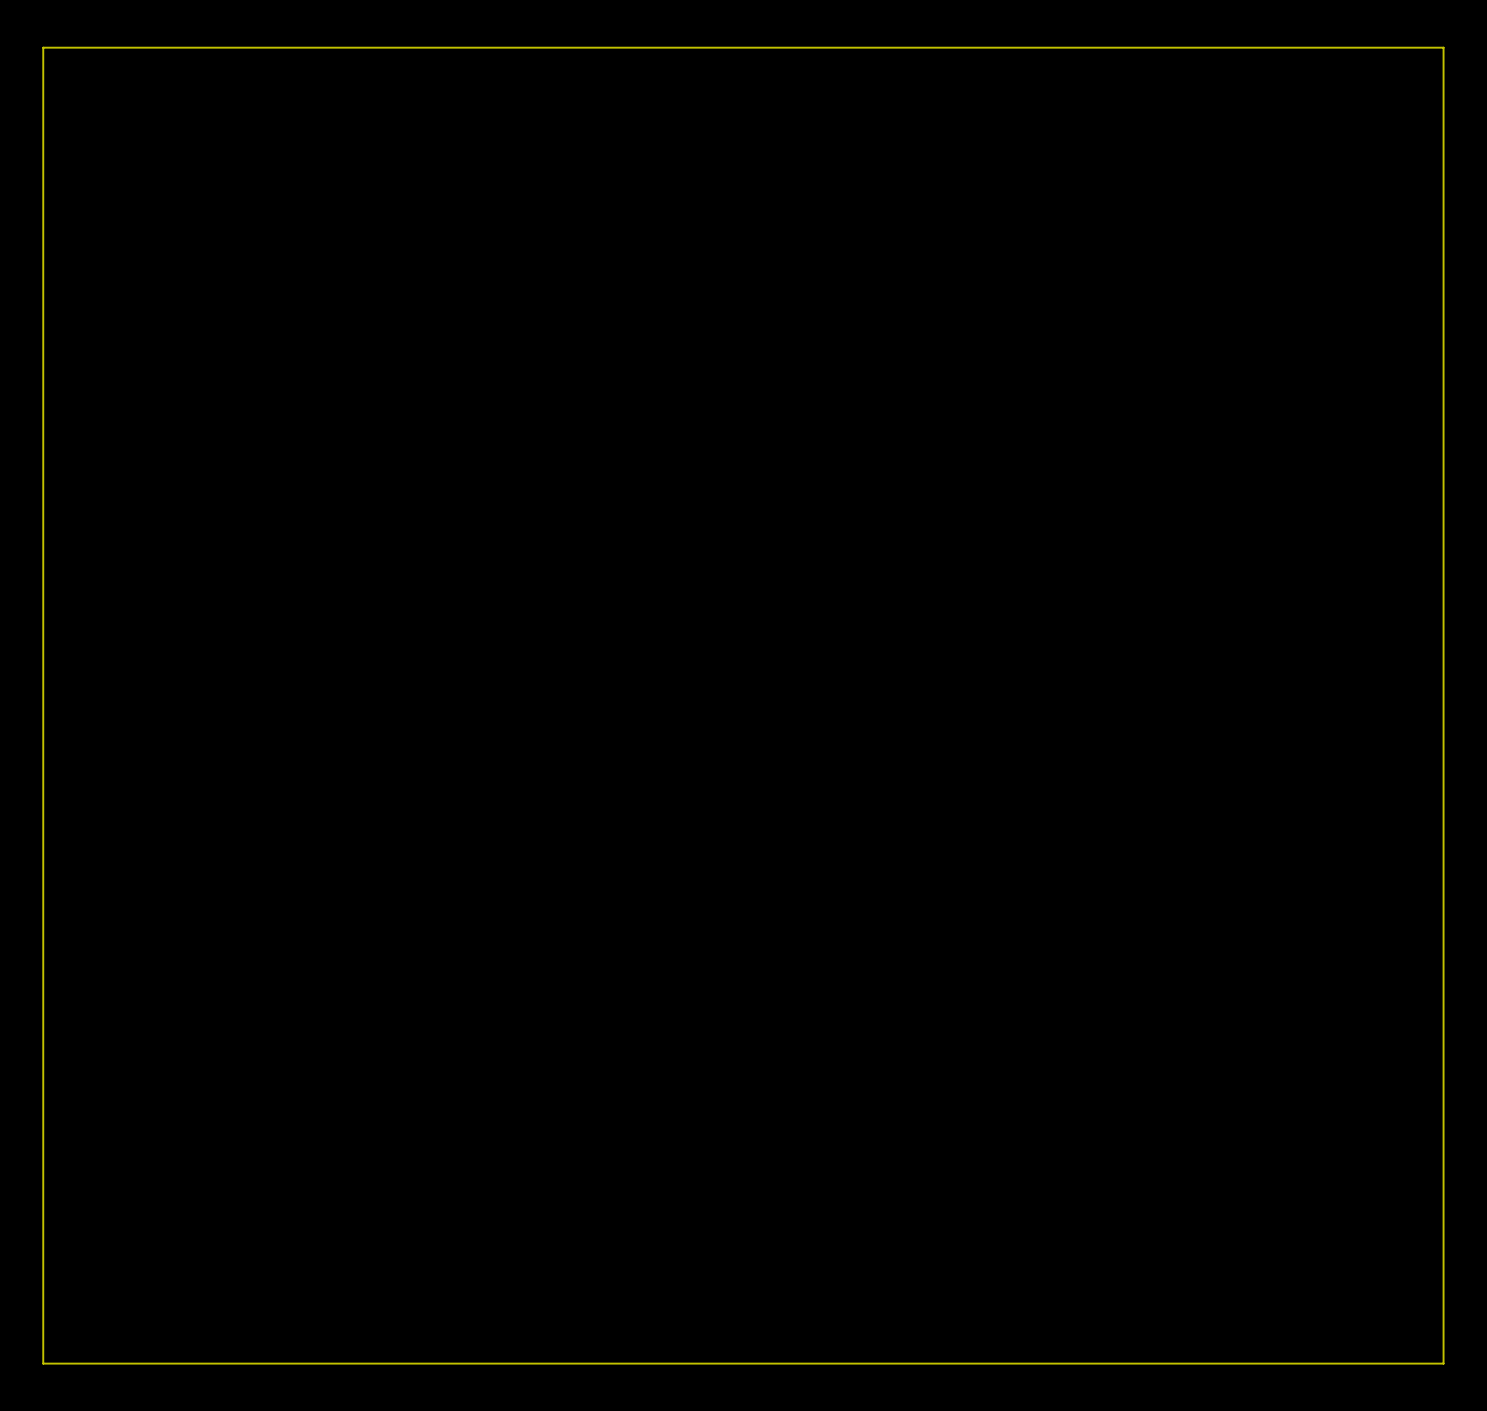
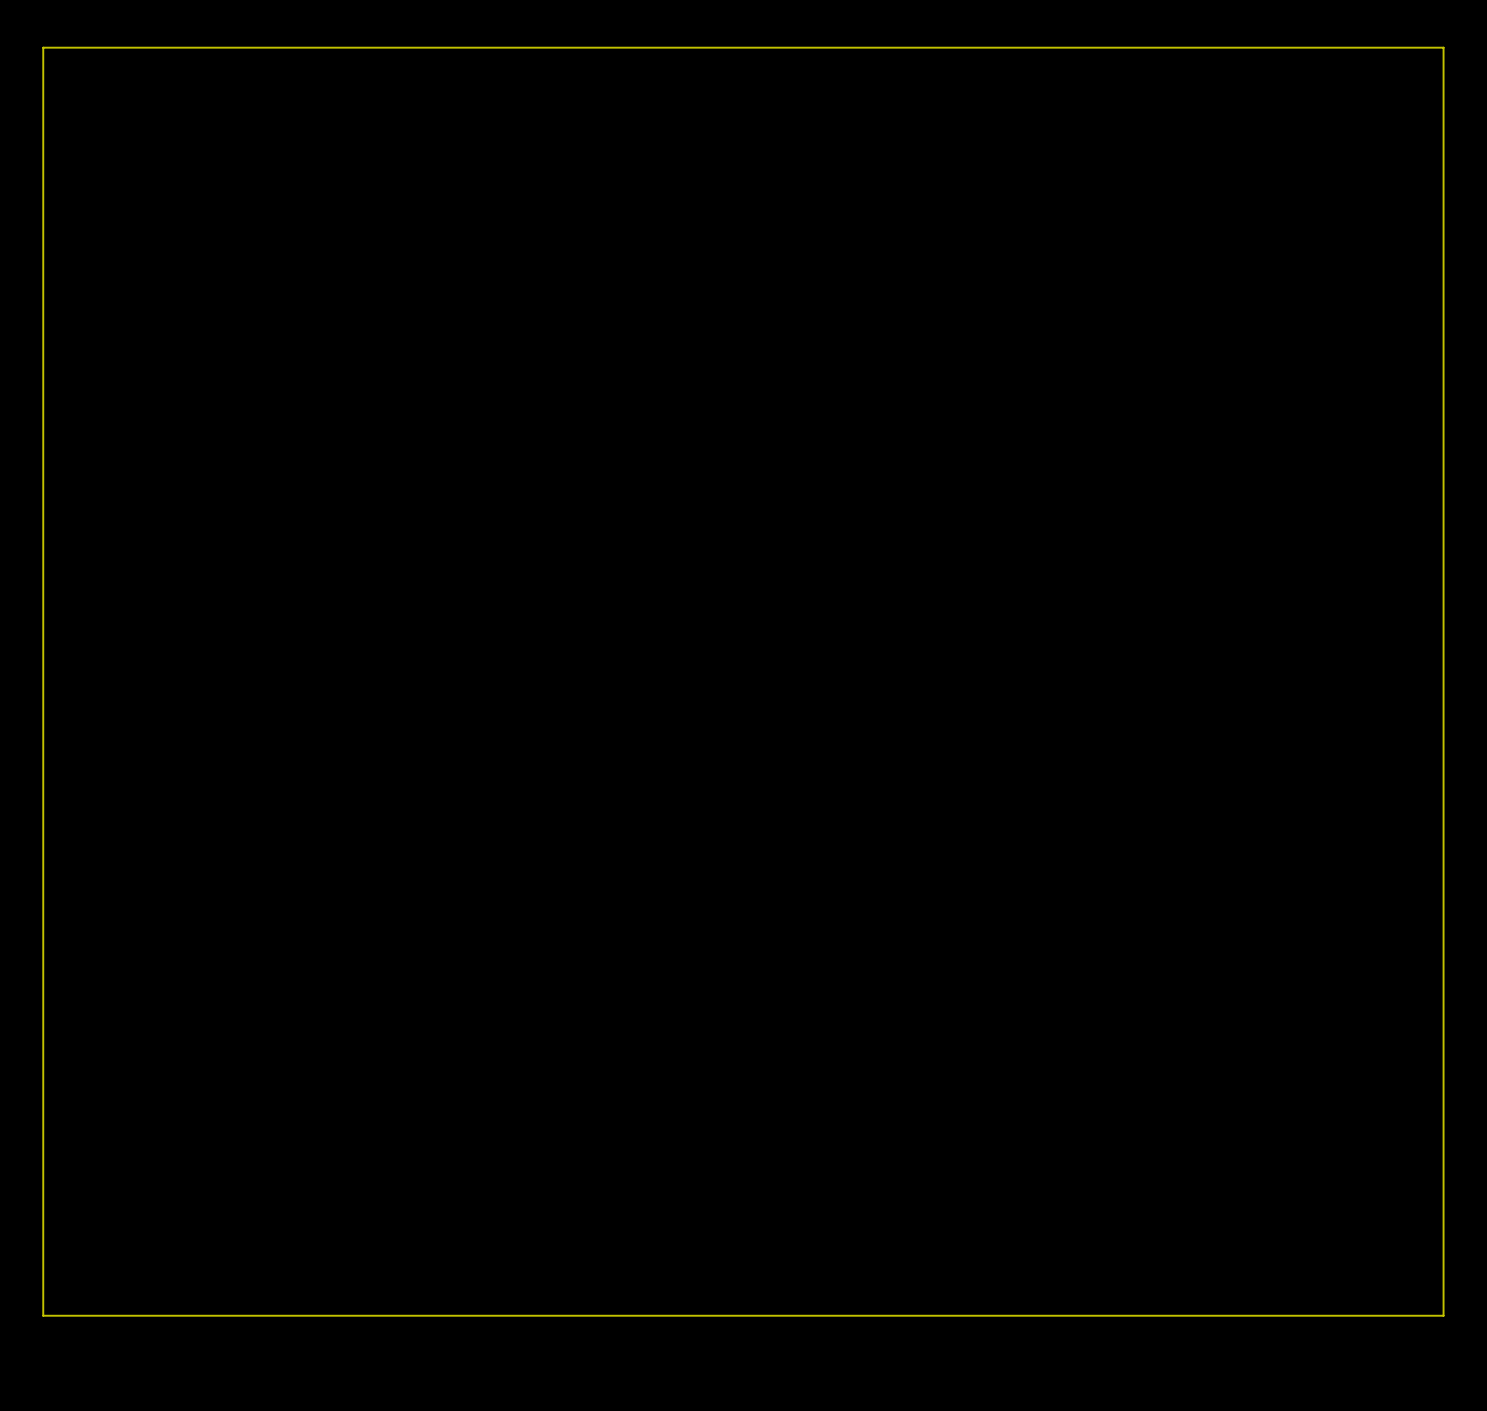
board edge: (43, 1315) (43, 1363) (1443, 1363) (1443, 1315) -> (43, 1315) (1443, 1315)

